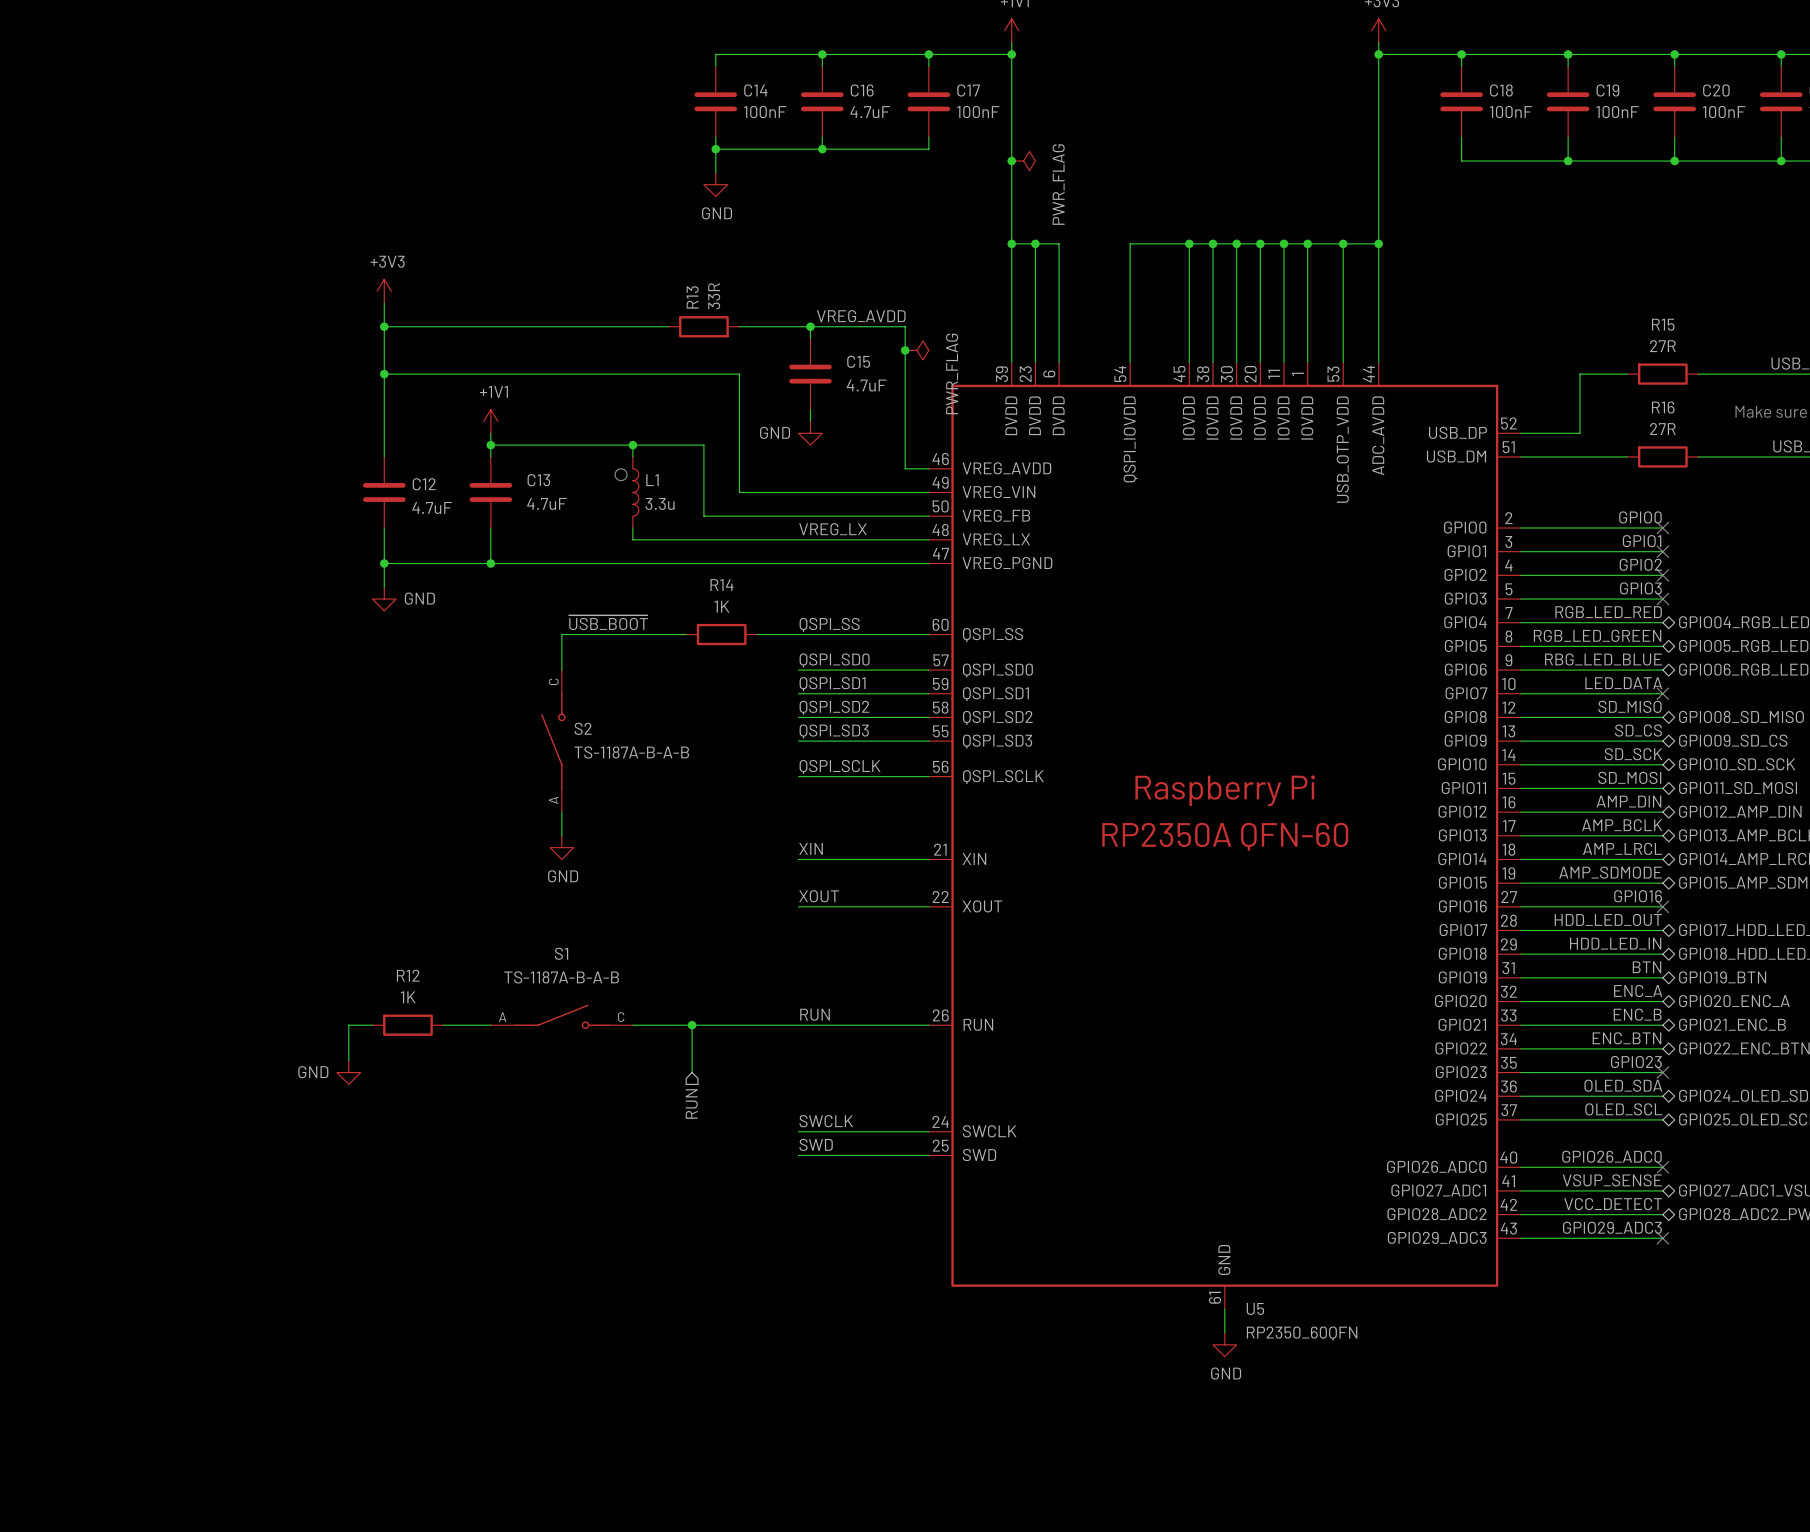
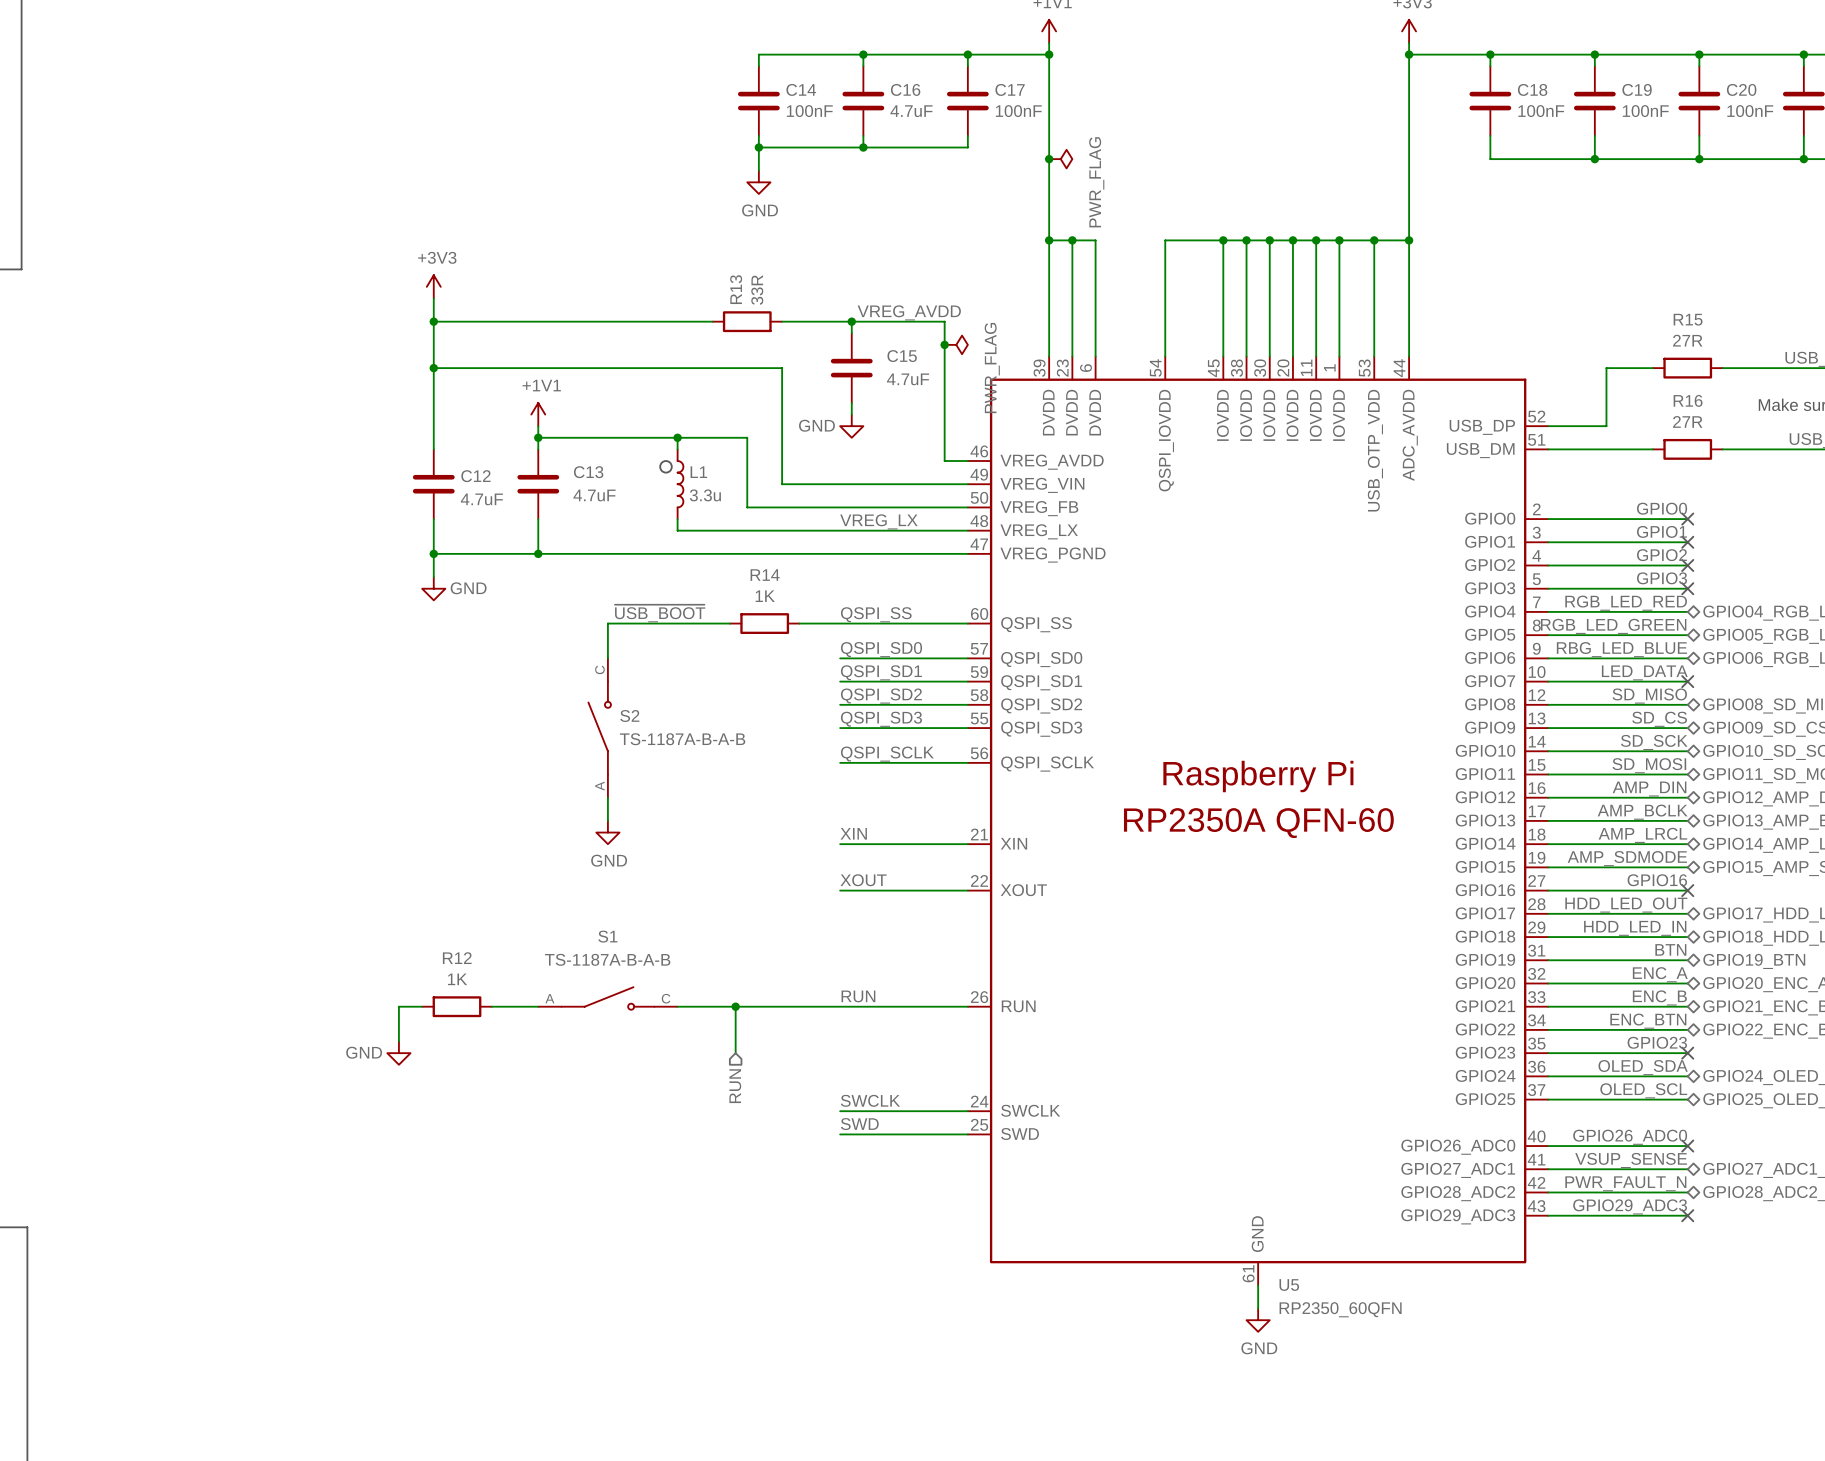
label: VCC_DETECT (1613, 1204) -> PWR_FAULT_N (1625, 1183)

